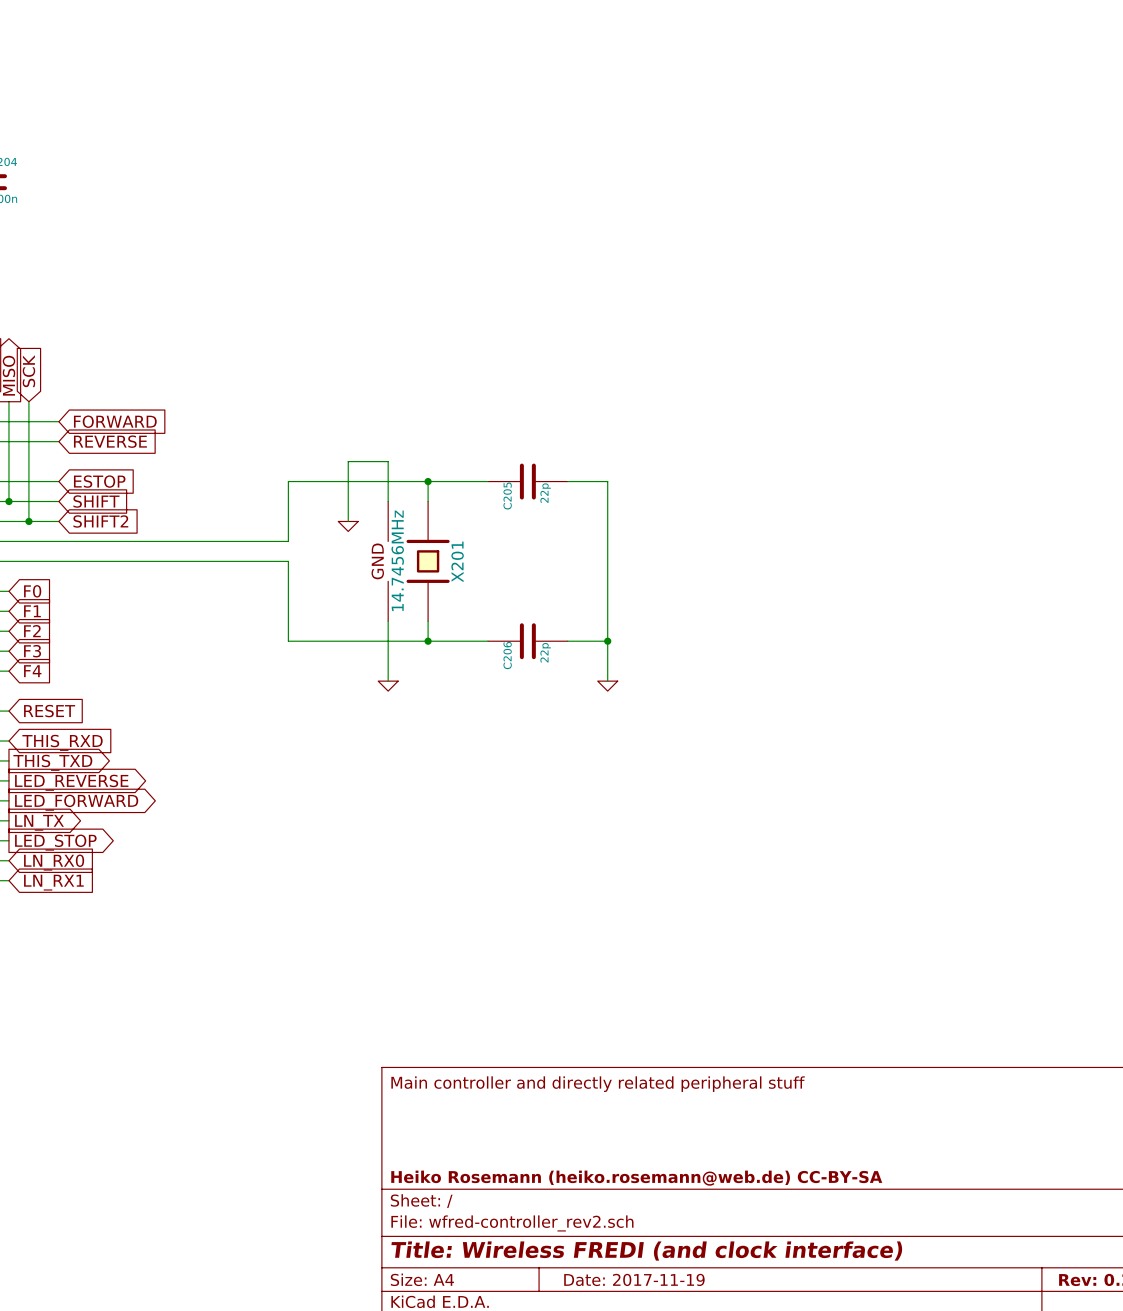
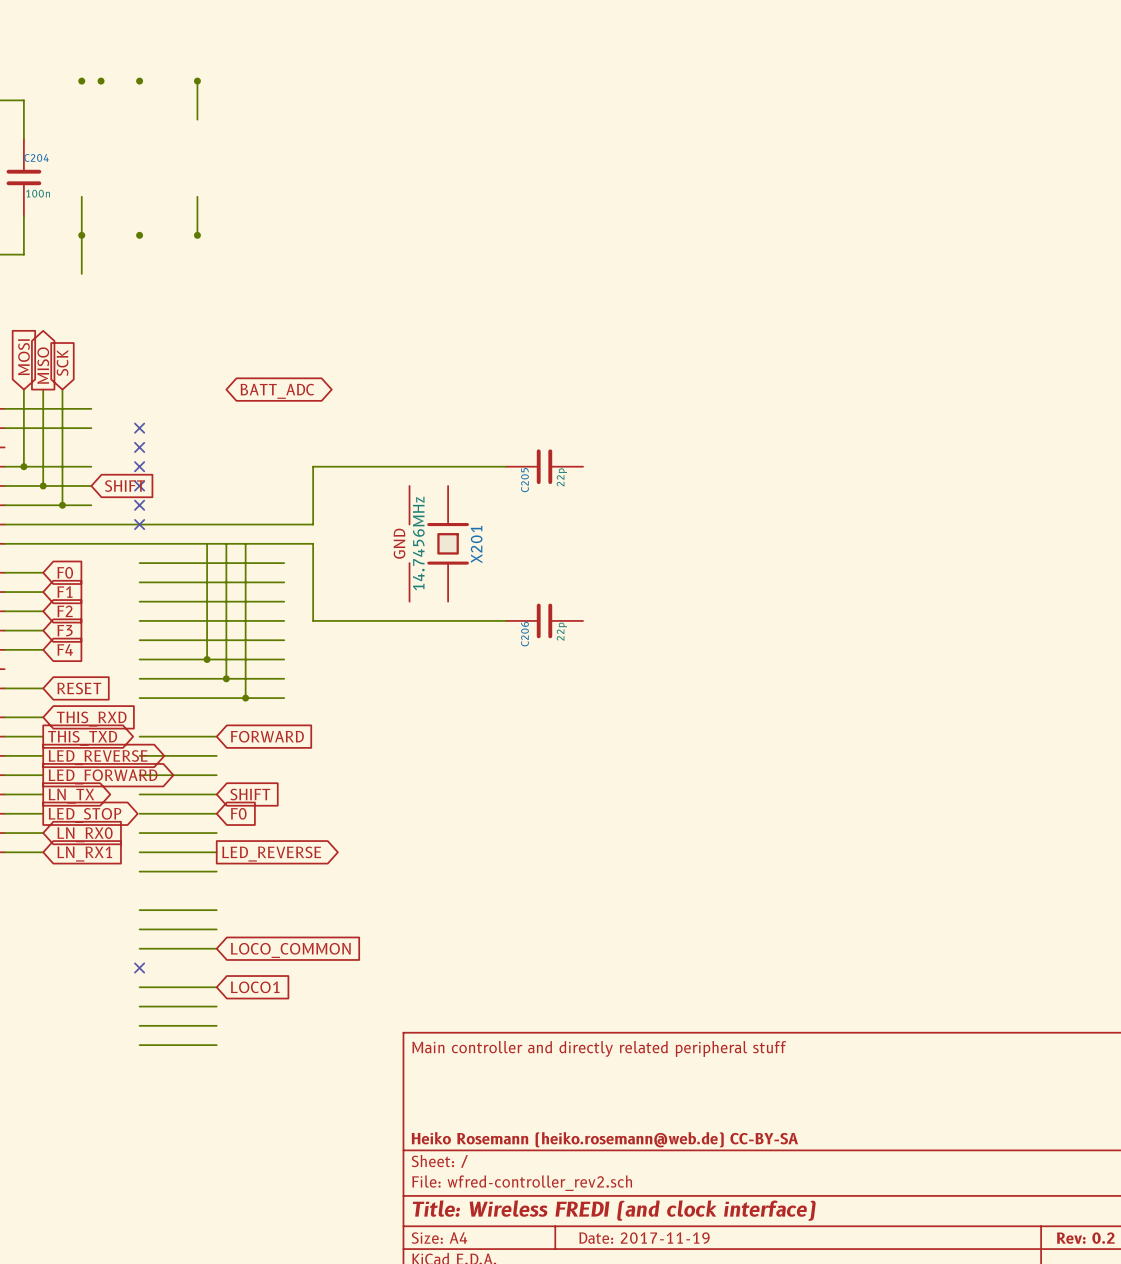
junction: none -> (81, 81)
junction: none -> (101, 81)
junction: none -> (139, 81)
wire: none -> (197, 81) (197, 119)
junction: none -> (197, 81)
wire: none -> (81, 196) (81, 273)
wire: none -> (197, 196) (197, 235)
junction: none -> (81, 235)
junction: none -> (139, 235)
junction: none -> (197, 235)
global label: none -> BATT_ADC (277, 391)
global label: FORWARD (115, 421) -> none
no-connect mark: none -> (139, 428)
global label: REVERSE (110, 441) -> none
no-connect mark: none -> (139, 447)
global label: ESTOP (99, 481) -> none
no-connect mark: none -> (139, 466)
wire: (428, 481) (428, 501) -> none
junction: (428, 481) -> none
wire: (567, 481) (607, 481) (607, 681) -> none
no-connect mark: none -> (139, 485)
wire: (388, 501) (388, 461) (348, 461) (348, 521) -> none
global label: SHIFT2 (100, 521) -> none
no-connect mark: none -> (139, 505)
power symbol: (348, 526) -> none
no-connect mark: none -> (139, 524)
wire: none -> (207, 543) (207, 659)
wire: none -> (226, 543) (226, 678)
wire: none -> (245, 543) (245, 698)
wire: none -> (139, 563) (284, 563)
wire: none -> (139, 582) (284, 582)
wire: none -> (139, 601) (284, 601)
wire: (388, 621) (388, 681) -> none
wire: (428, 621) (428, 641) -> none
wire: none -> (139, 620) (284, 620)
junction: (428, 641) -> none
wire: (567, 641) (607, 641) -> none
junction: (607, 641) -> none
wire: none -> (139, 640) (284, 640)
wire: none -> (139, 659) (284, 659)
junction: none -> (207, 659)
power symbol: (388, 686) -> none
power symbol: (607, 686) -> none
wire: none -> (139, 678) (284, 678)
junction: none -> (226, 678)
wire: none -> (139, 698) (284, 698)
junction: none -> (245, 698)
wire: none -> (139, 736) (216, 736)
global label: none -> FORWARD (267, 736)
wire: none -> (139, 755) (216, 755)
wire: none -> (139, 775) (216, 775)
wire: none -> (139, 794) (216, 794)
global label: none -> SHIFT (250, 794)
wire: none -> (139, 813) (216, 813)
global label: none -> F0 (238, 813)
wire: none -> (139, 833) (216, 833)
wire: none -> (139, 852) (216, 852)
global label: none -> LED_REVERSE (271, 854)
wire: none -> (139, 871) (216, 871)
wire: none -> (139, 910) (216, 910)
wire: none -> (139, 929) (216, 929)
wire: none -> (139, 948) (216, 948)
global label: none -> LOCO_COMMON (290, 950)
no-connect mark: none -> (139, 968)
wire: none -> (139, 987) (216, 987)
global label: none -> LOCO1 (255, 987)
wire: none -> (139, 1006) (216, 1006)
wire: none -> (139, 1025) (216, 1025)
wire: none -> (139, 1045) (216, 1045)

